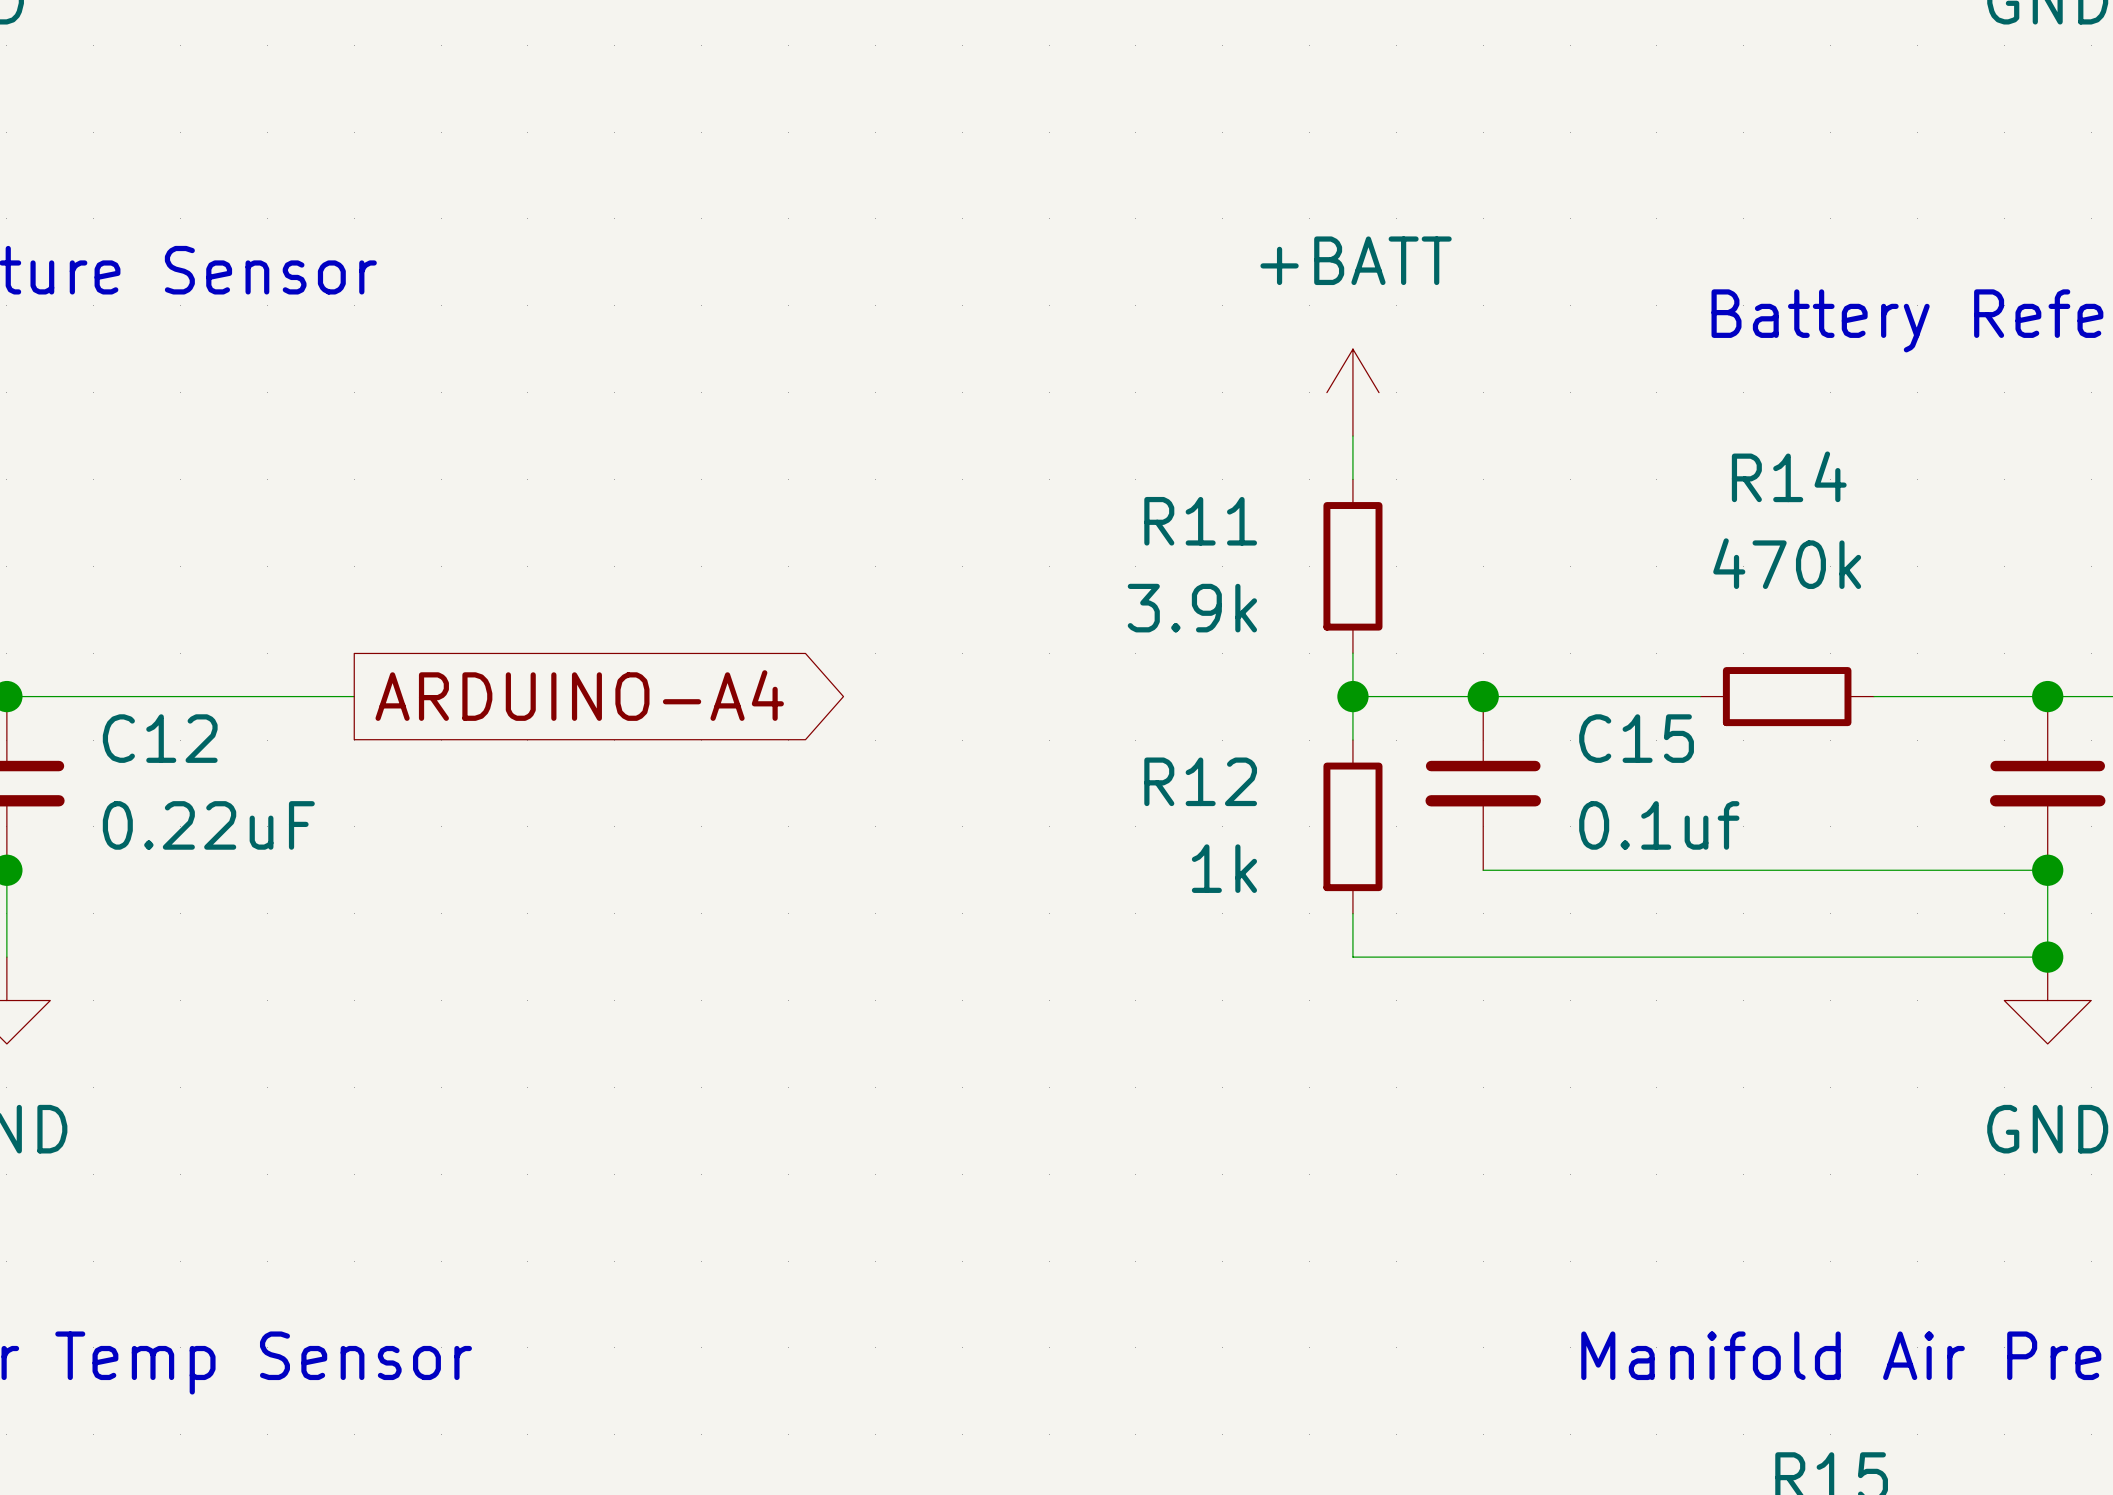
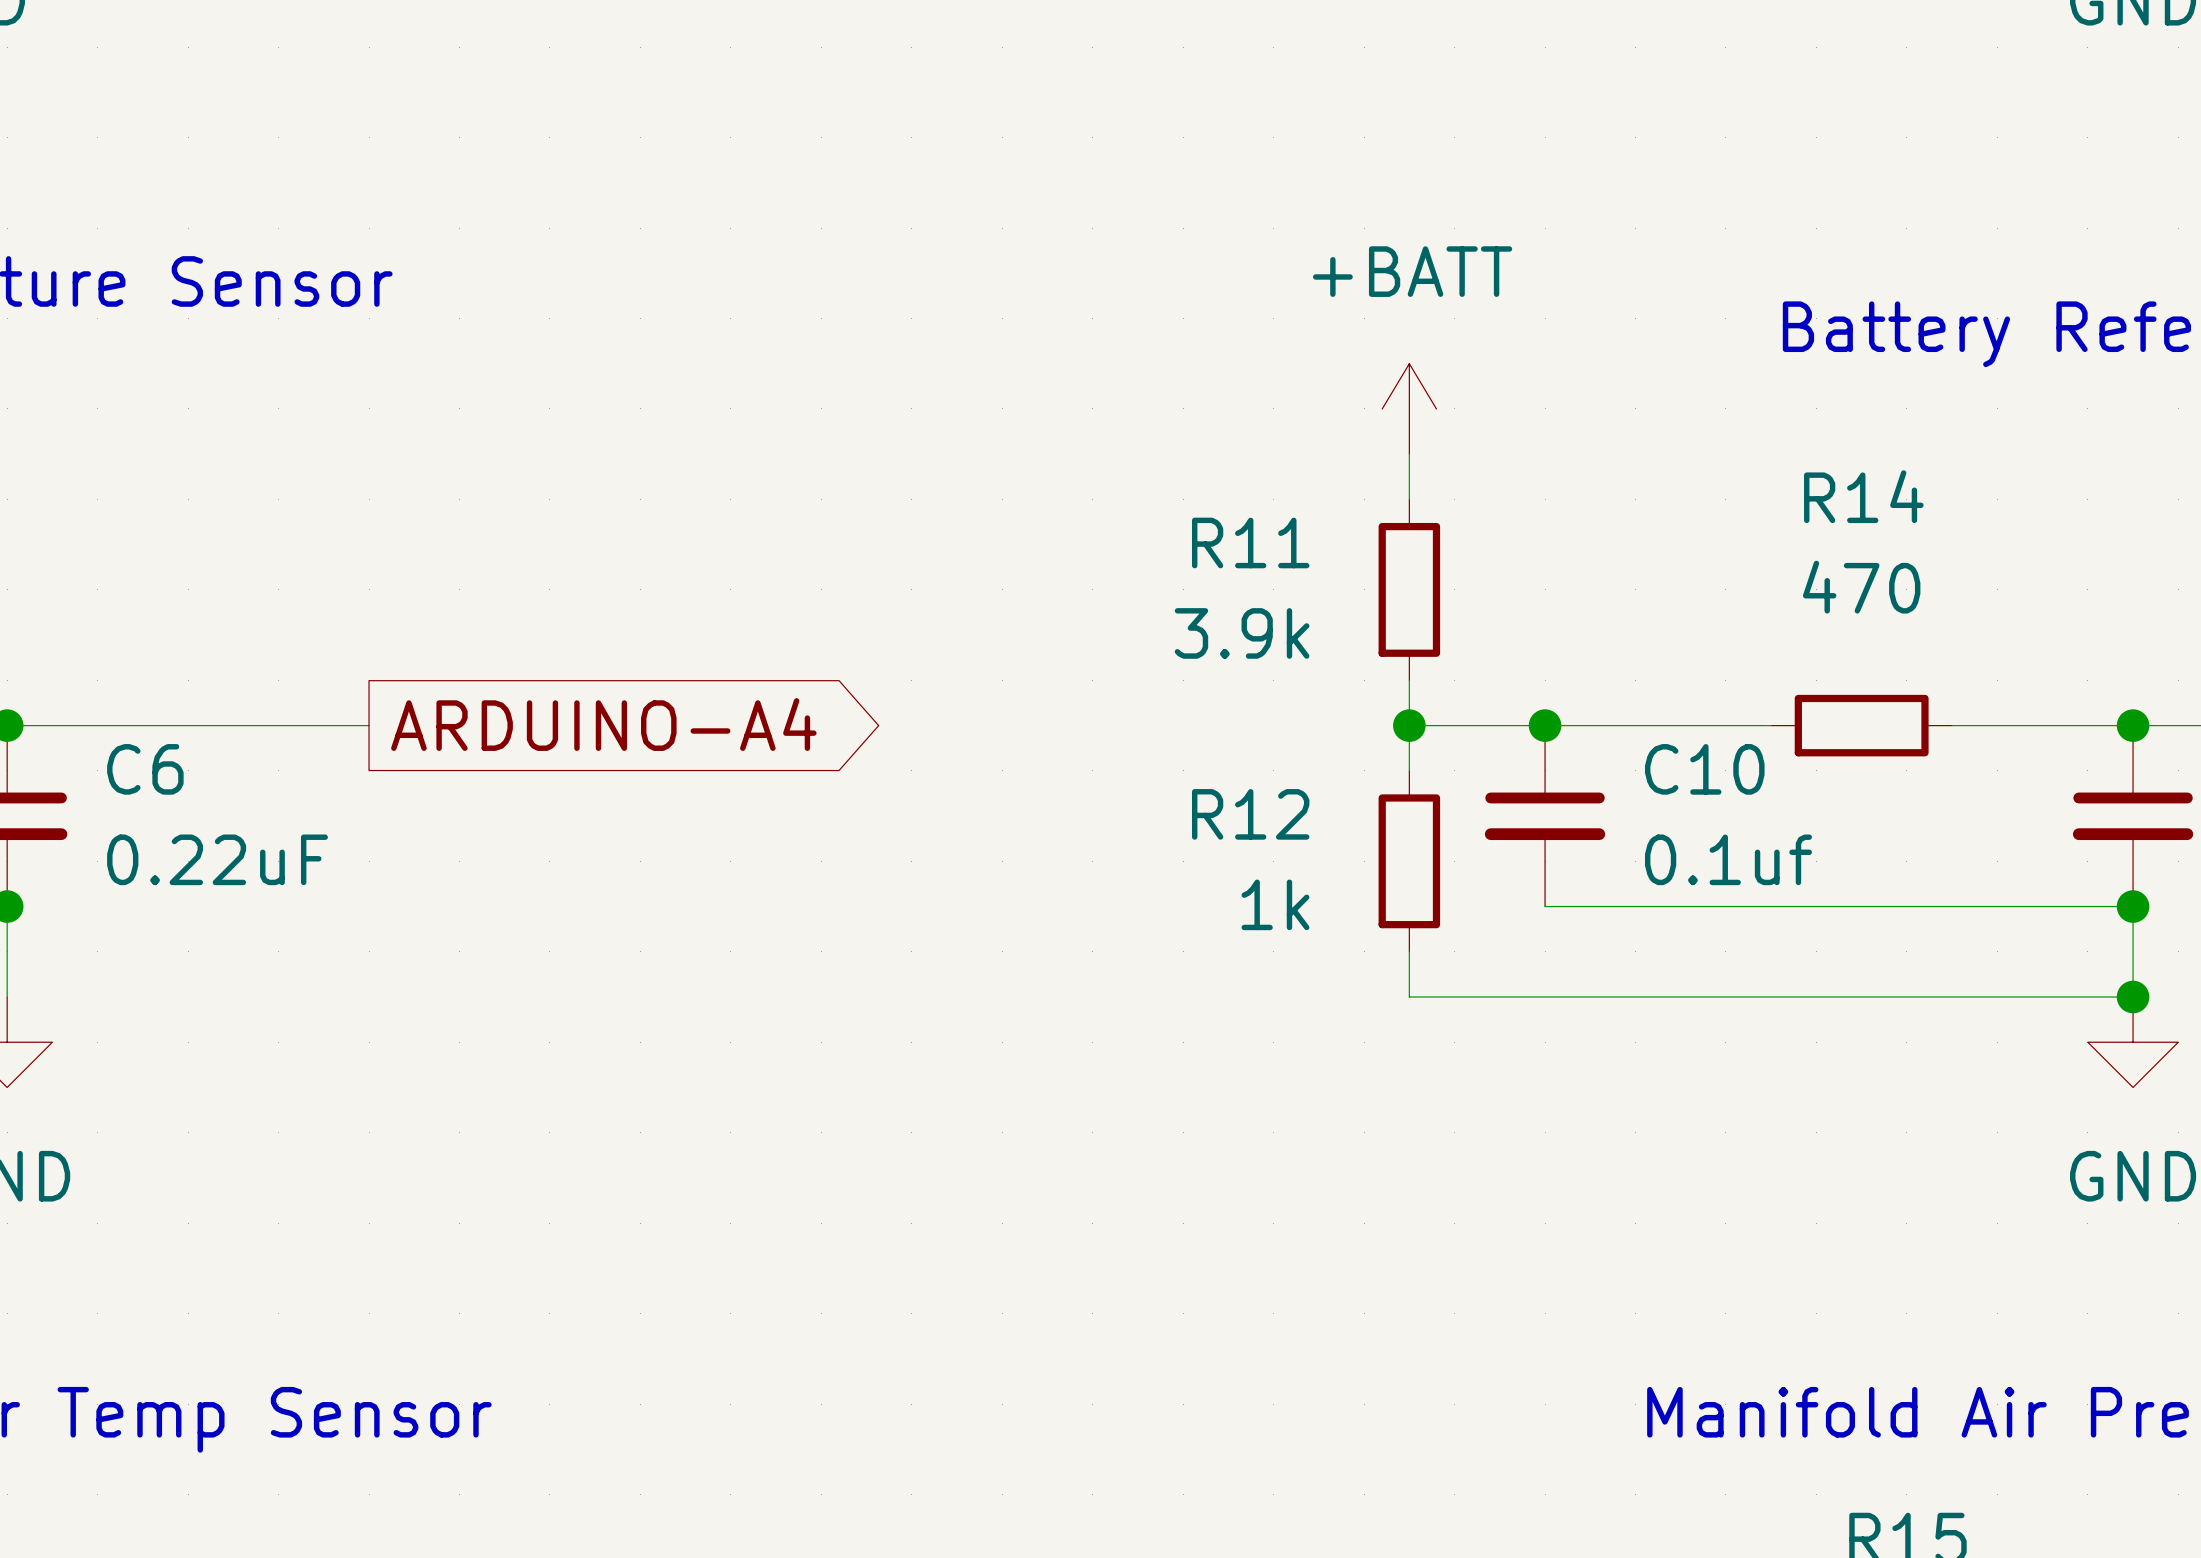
R14 value: 470k (1787, 563) -> 470 (1861, 587)
C12 name: C12 (160, 738) -> C6 (145, 769)
C15 name: C15 (1636, 738) -> C10 (1704, 769)

